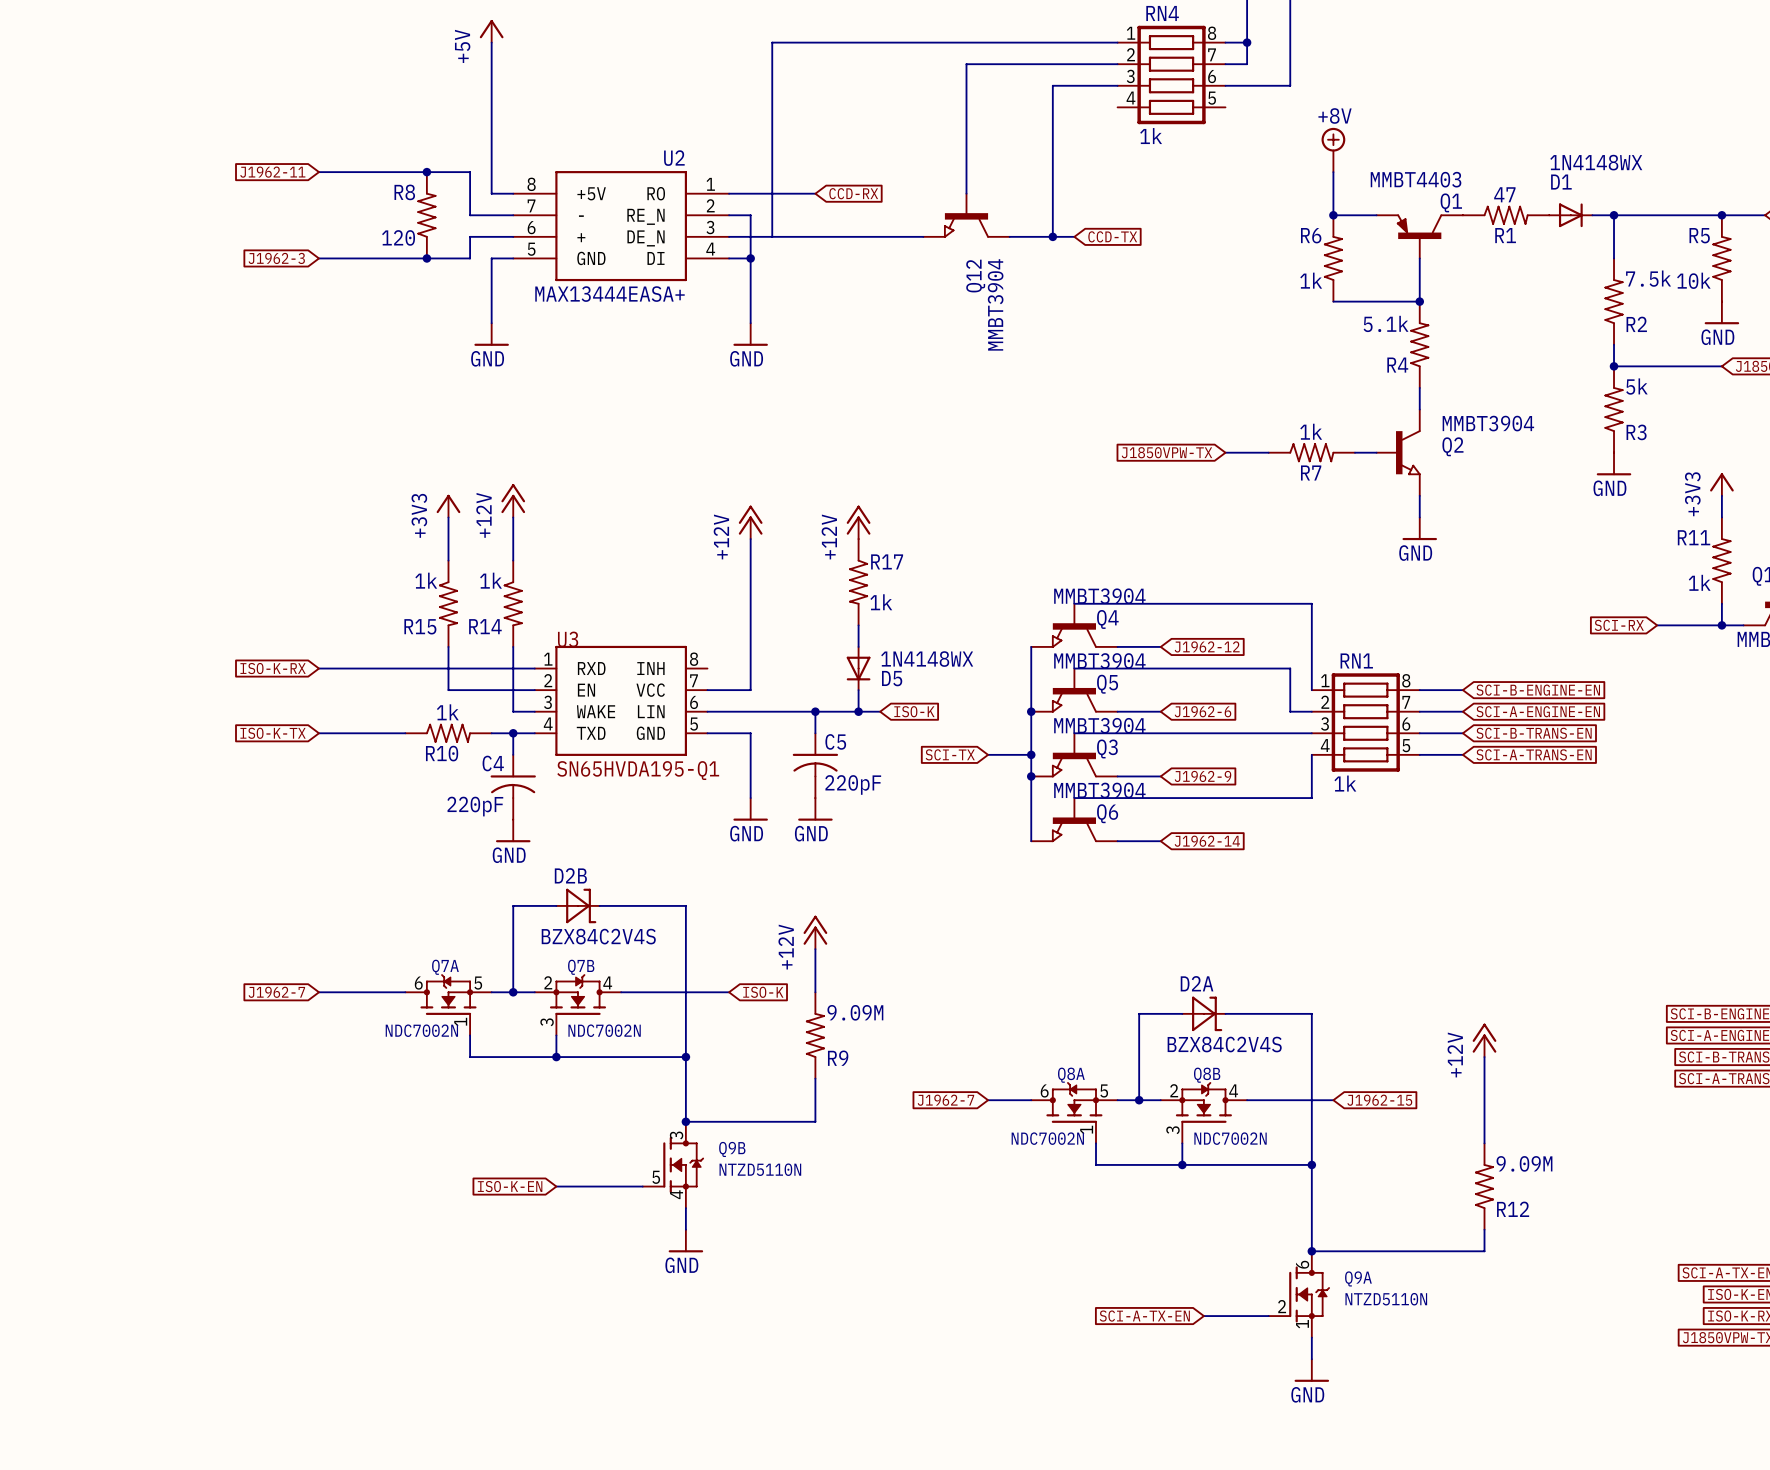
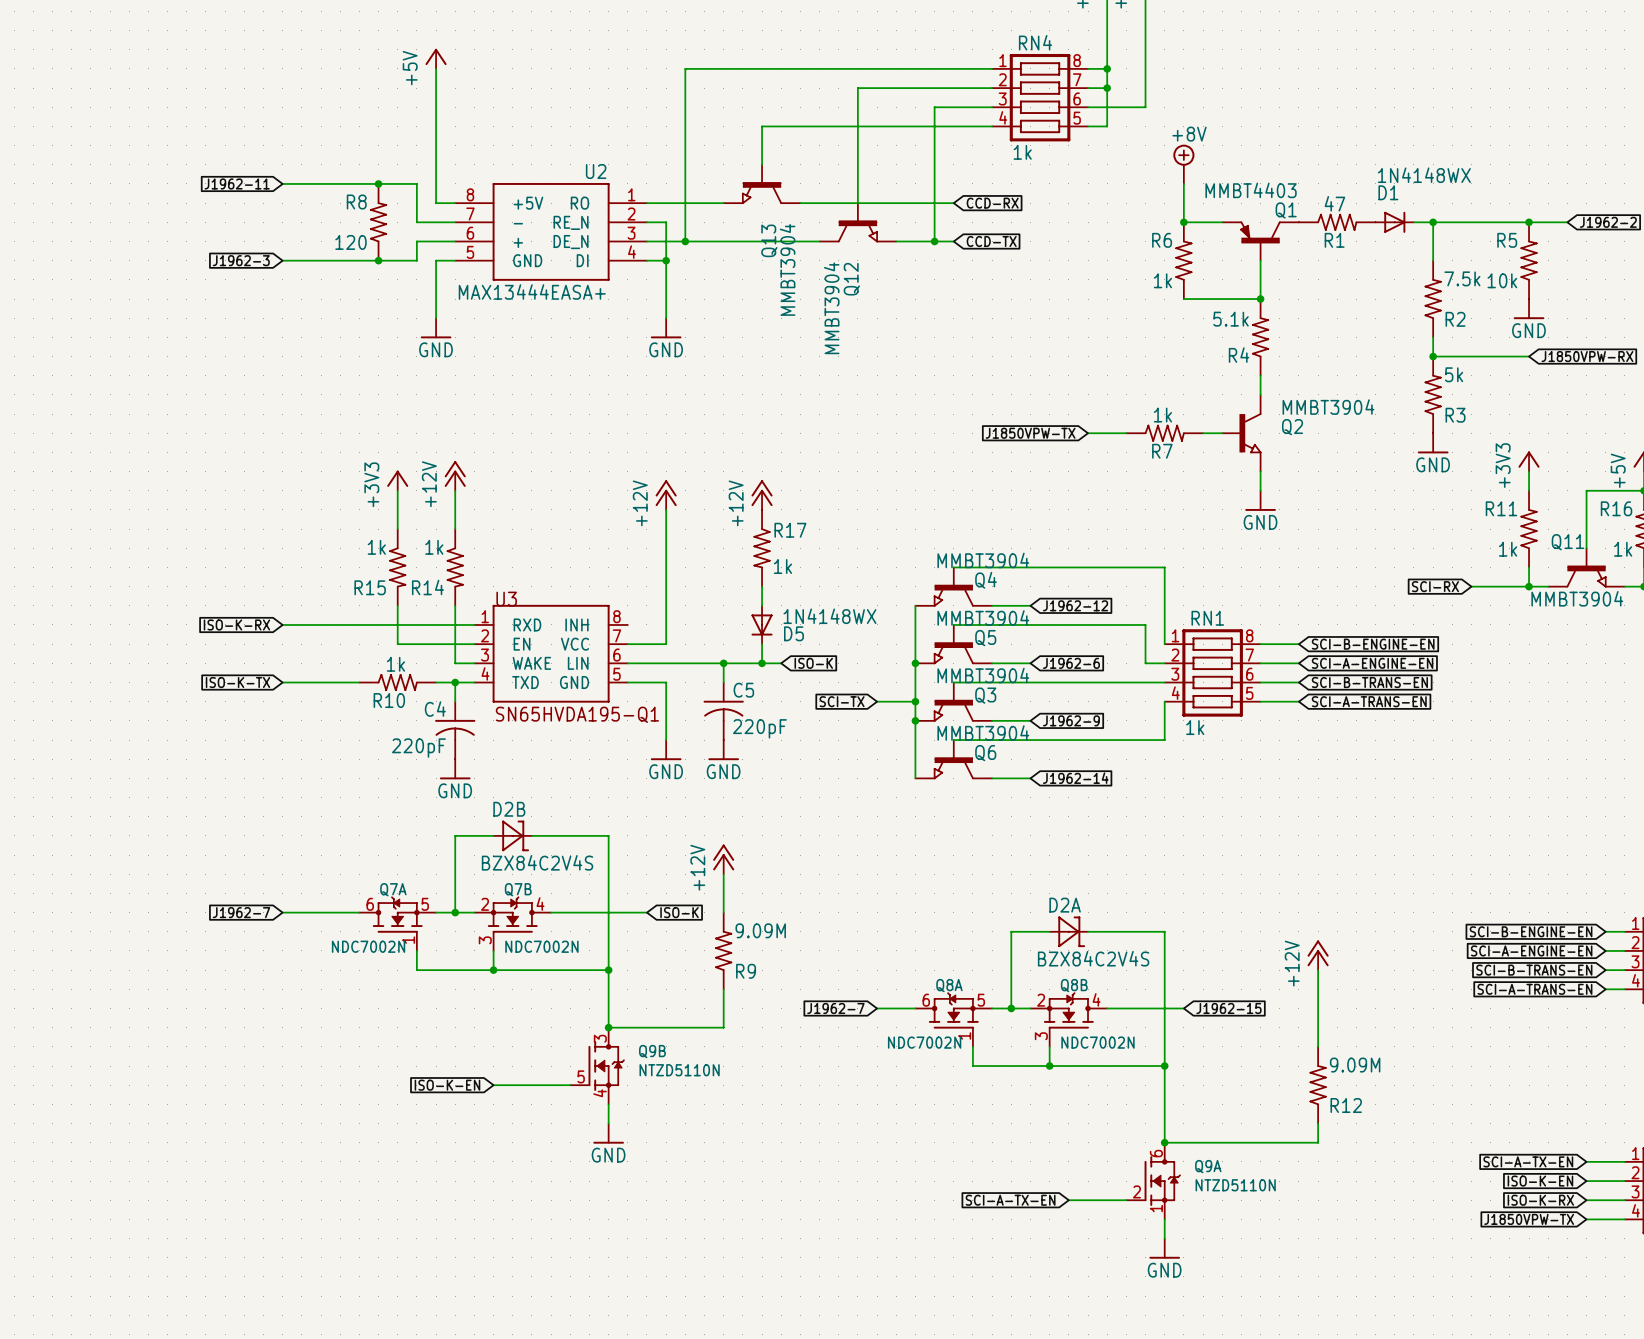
wire: none -> (1107, 88) (1107, 126) (1088, 126)
junction: none -> (1107, 88)
wire: none -> (992, 126) (762, 126) (762, 164)
Q13: none -> MMBT3904 (762, 184)
global label: CCD-RX (853, 193) -> none
wire: none -> (800, 203) (953, 203)
global label: none -> CCD-RX (992, 203)
Q12 flip: as is (966, 225) -> left-right (857, 231)
junction: none -> (685, 241)

